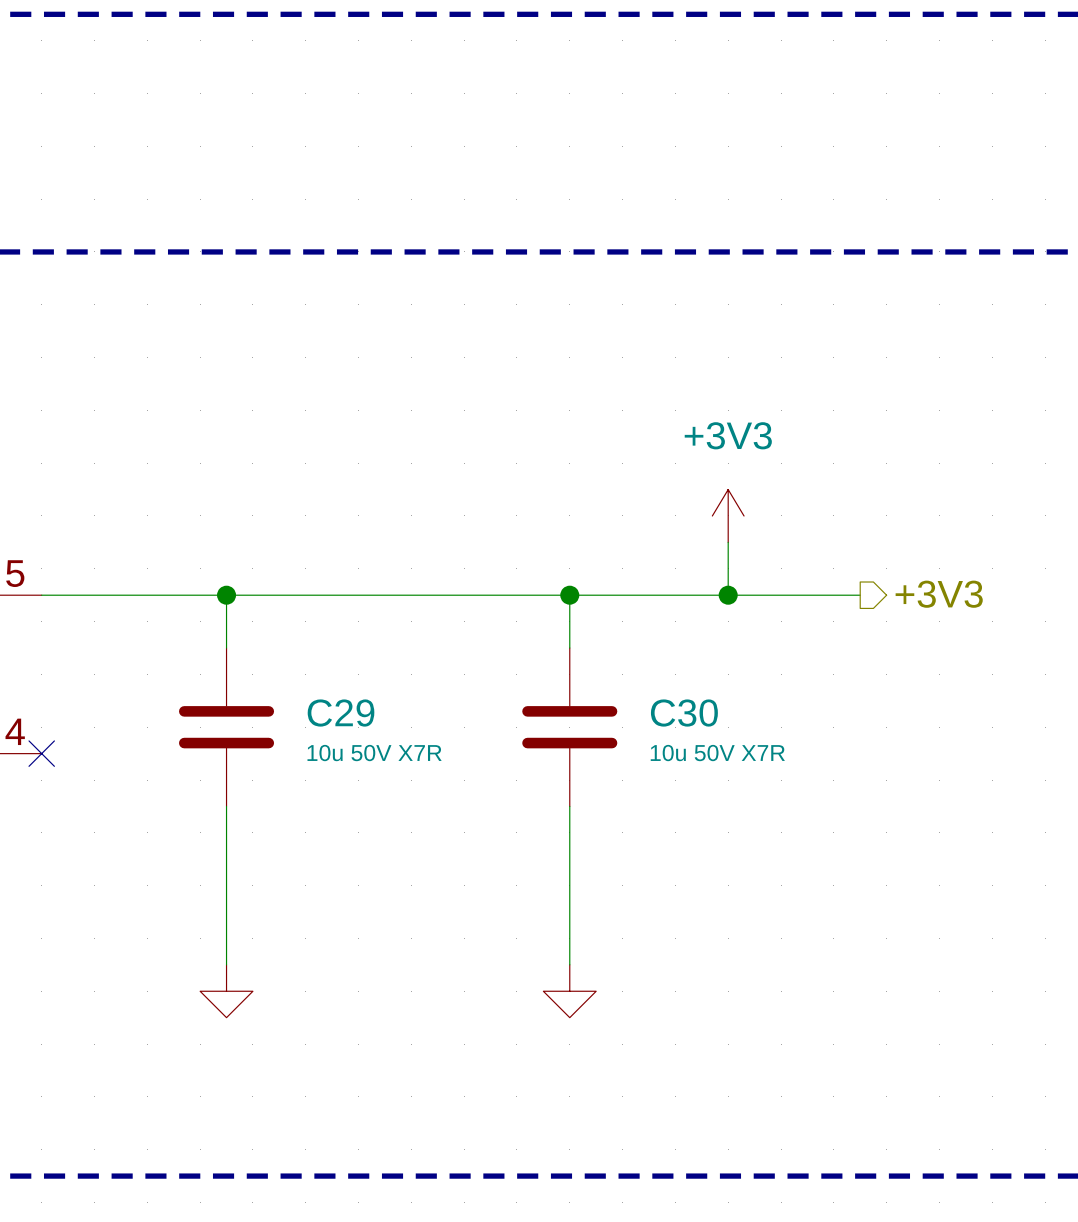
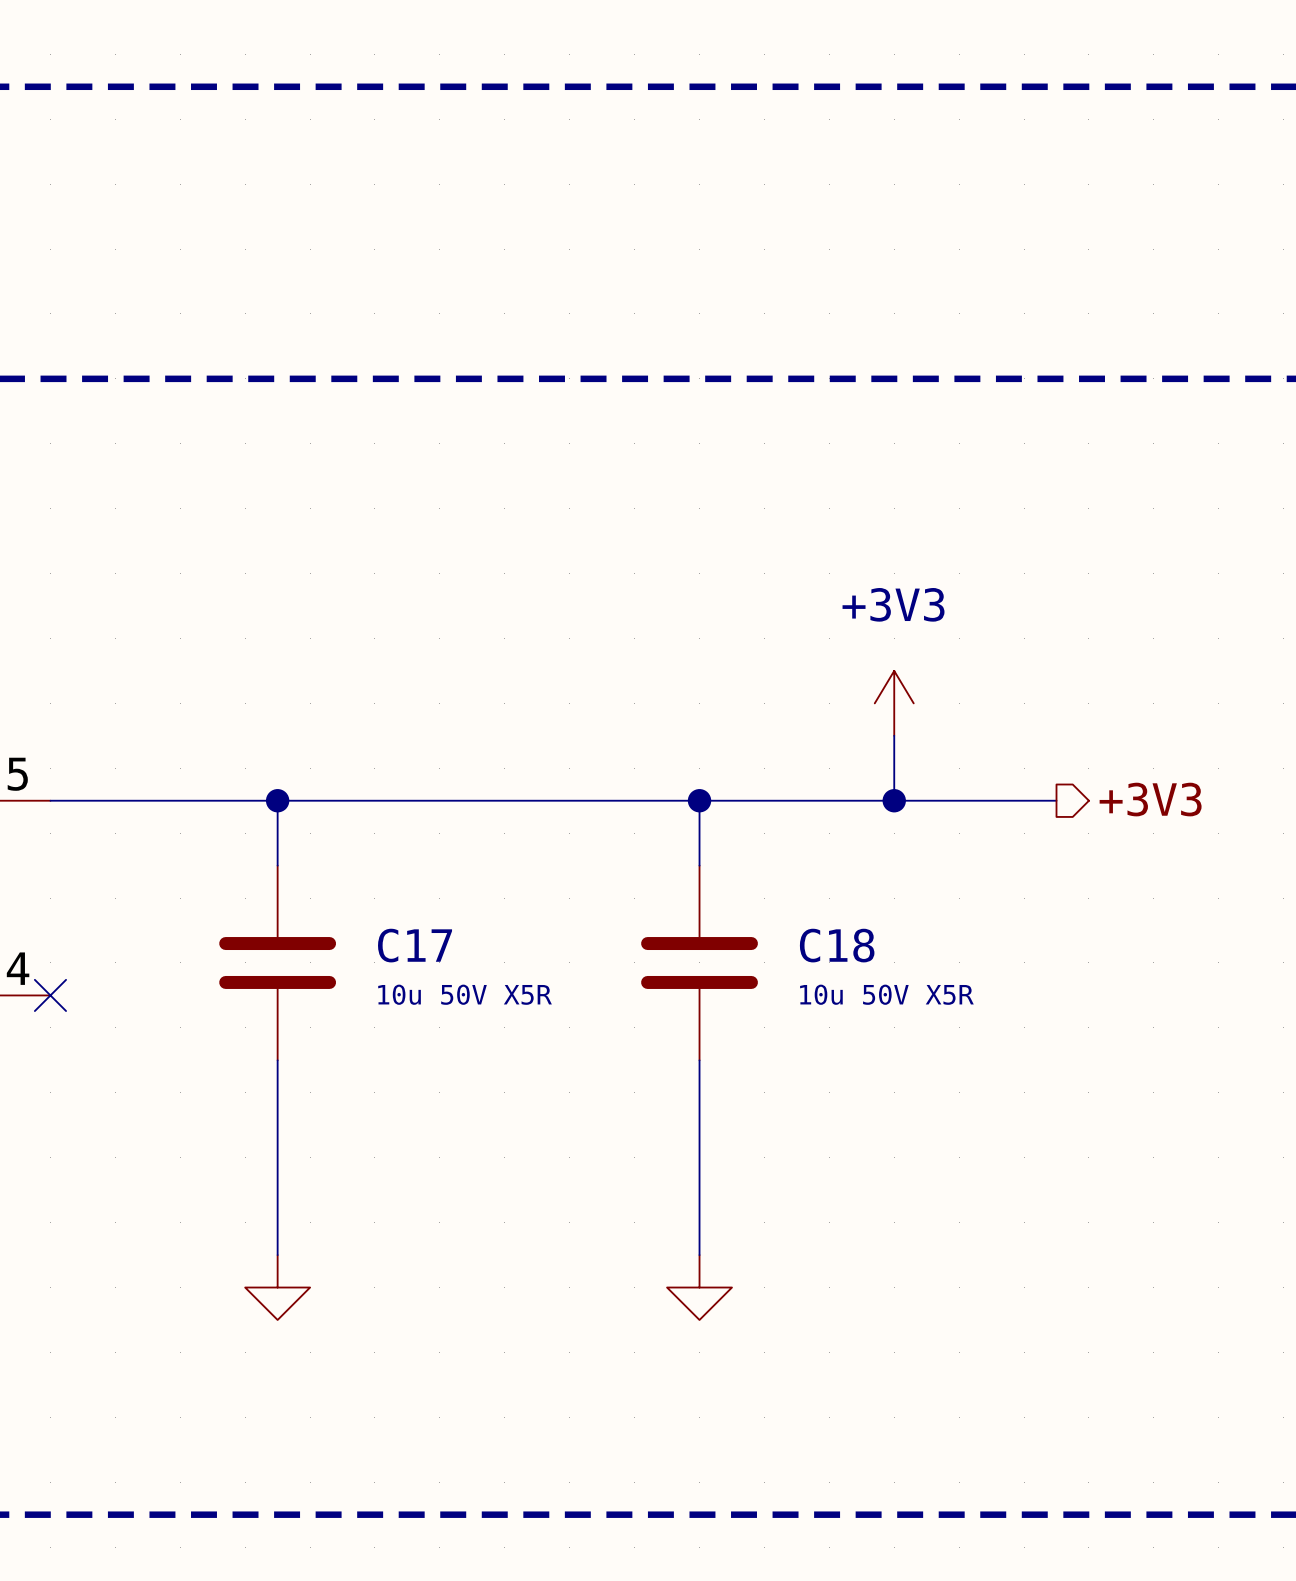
C29 name: C29 (341, 713) -> C17 (415, 945)
C30 name: C30 (684, 713) -> C18 (837, 945)
C29 value: 10u 50V X7R (374, 753) -> 10u 50V X5R (465, 994)
C30 value: 10u 50V X7R (717, 753) -> 10u 50V X5R (886, 994)

